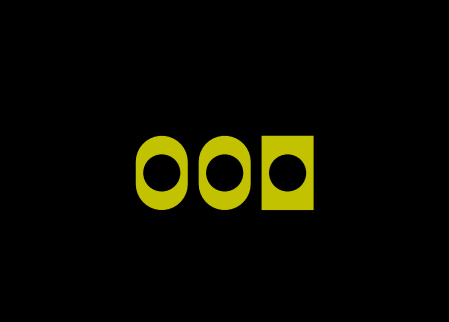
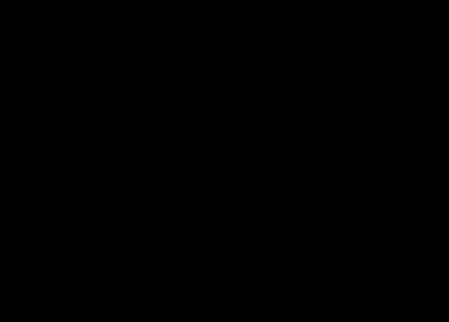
part: (224, 172) -> none

